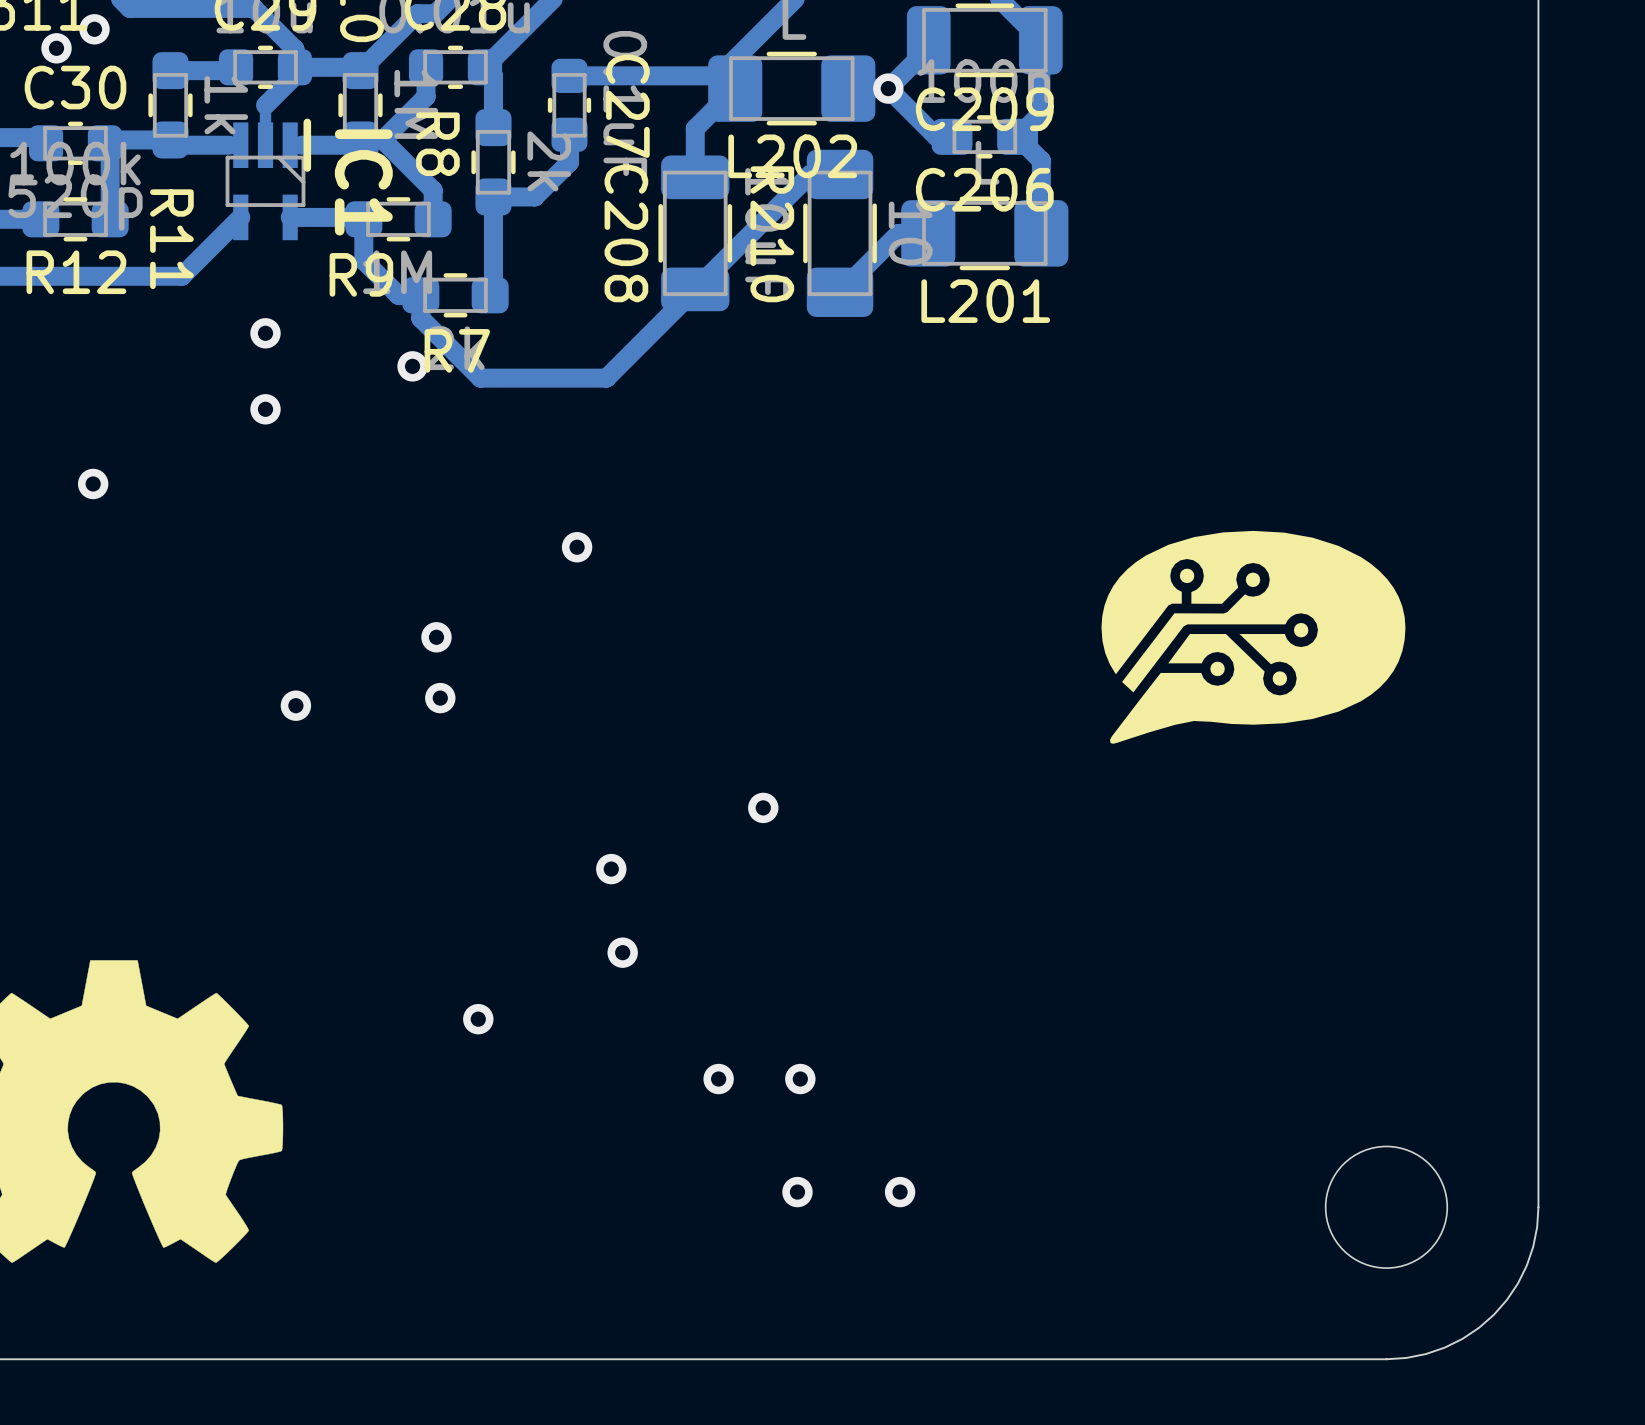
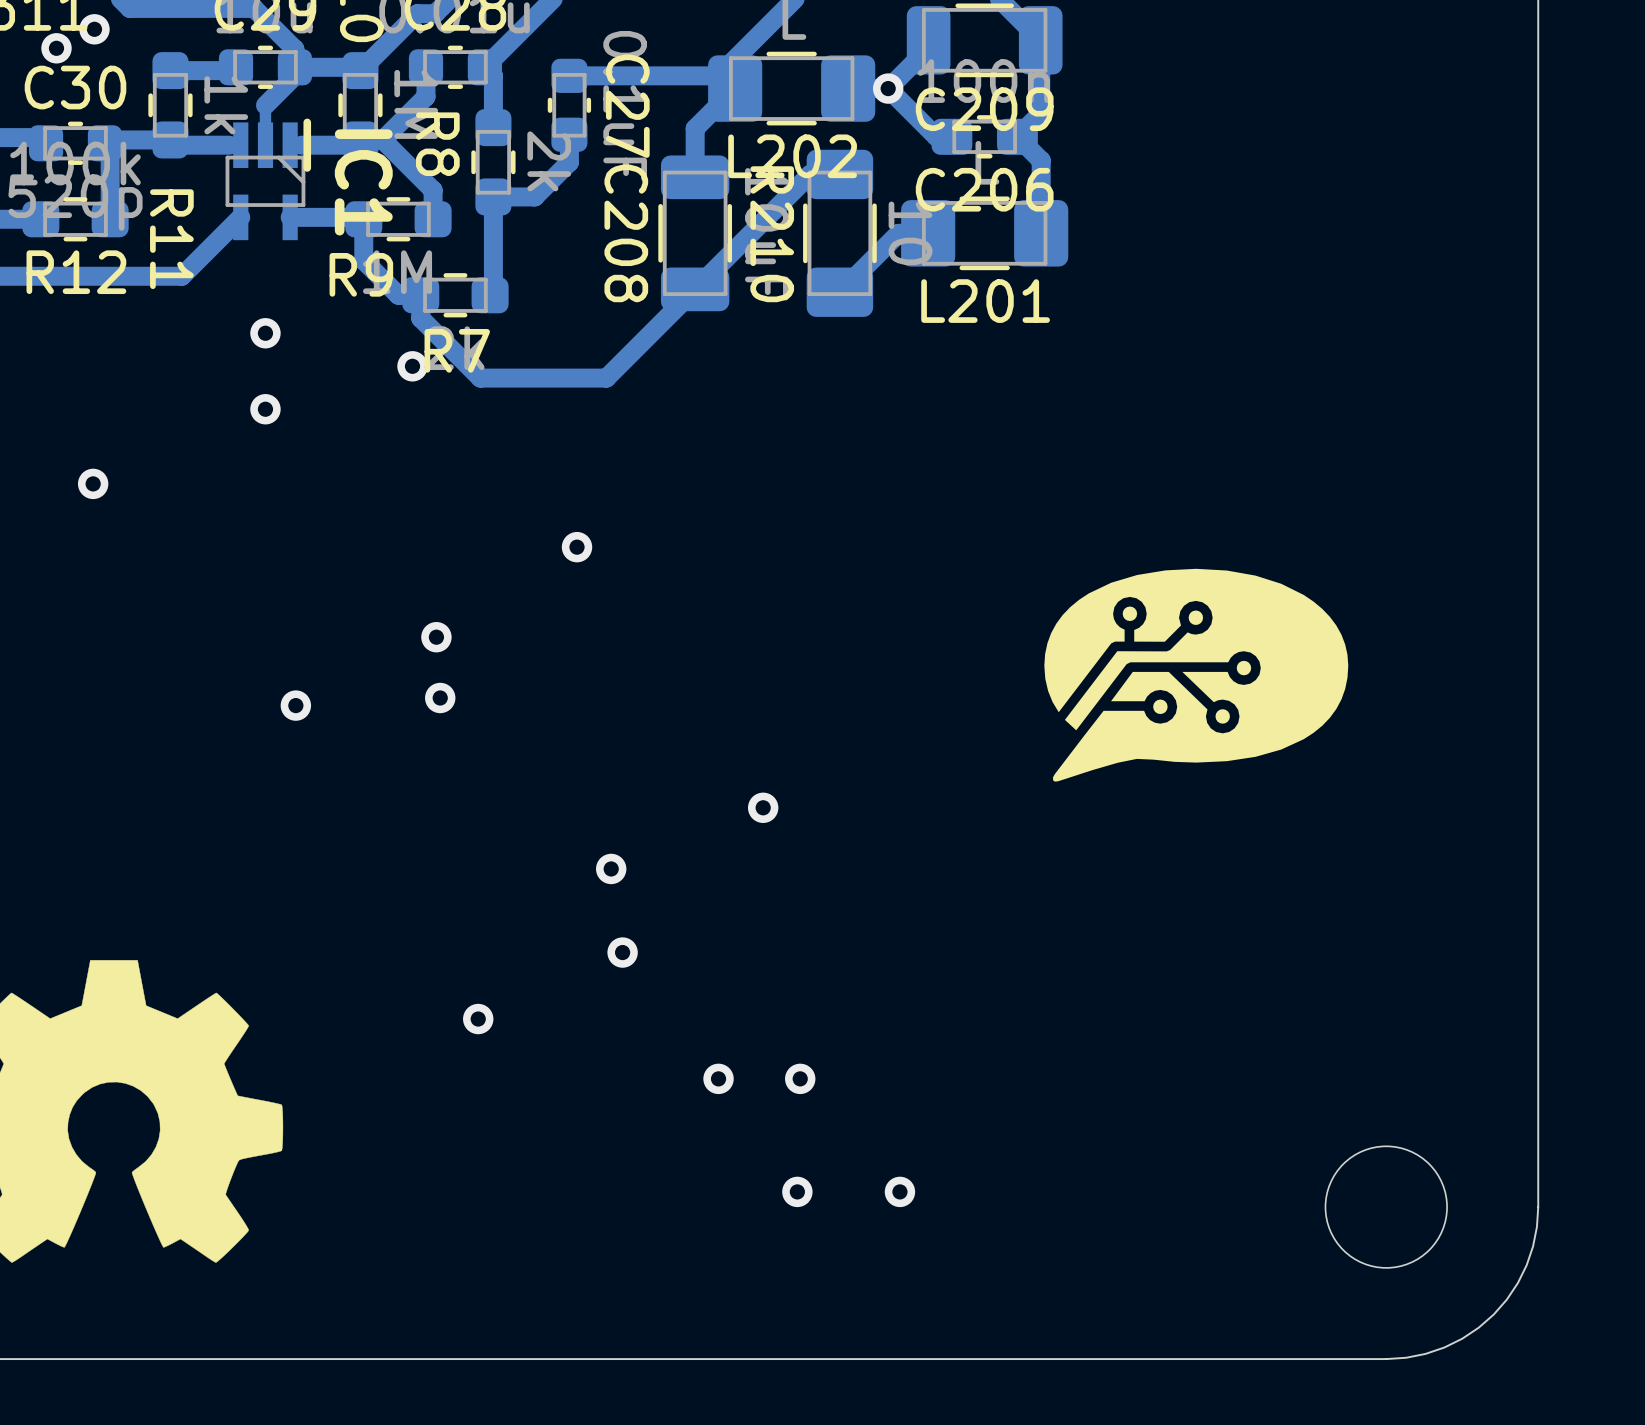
drawing position: (1253, 637) -> (1196, 675)

